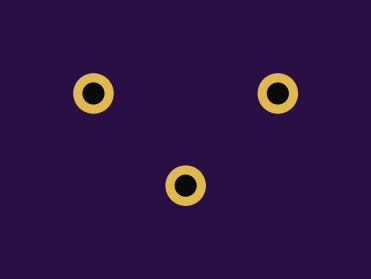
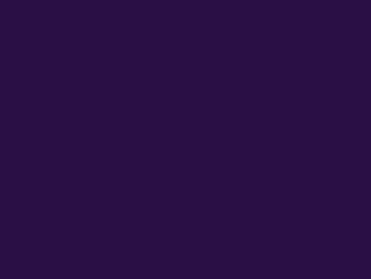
part: (185, 139) -> none

